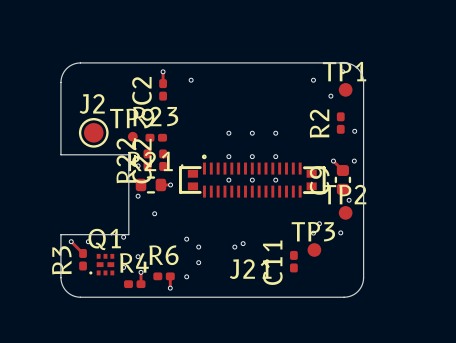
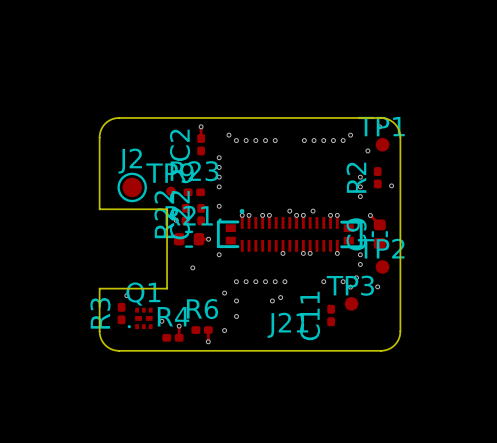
via: none -> (236, 140)
via: none -> (246, 140)
via: none -> (255, 140)
via: none -> (265, 140)
via: none -> (275, 140)
via: none -> (304, 140)
via: none -> (314, 140)
via: none -> (323, 140)
via: none -> (333, 140)
via: none -> (343, 140)
via: none -> (219, 157)
via: none -> (219, 167)
via: none -> (219, 177)
via: none -> (360, 177)
via: none -> (219, 186)
via: none -> (360, 186)
via: (228, 133) -> none
via: (252, 133) -> none
via: (275, 133) -> none
via: none -> (360, 196)
via: none -> (219, 206)
via: (228, 156) -> none
via: none -> (242, 215)
via: none -> (249, 215)
via: none -> (262, 215)
via: none -> (269, 215)
via: none -> (296, 215)
via: none -> (303, 215)
via: none -> (330, 215)
via: none -> (337, 215)
via: (354, 161) -> none
via: (228, 180) -> none
via: (252, 180) -> none
via: (275, 180) -> none
via: (138, 196) -> none
via: none -> (282, 253)
via: none -> (303, 253)
via: none -> (310, 253)
via: none -> (337, 253)
via: none -> (219, 254)
via: none -> (360, 254)
via: (349, 200) -> none
via: none -> (360, 264)
via: none -> (236, 281)
via: none -> (246, 281)
via: none -> (255, 281)
via: none -> (265, 281)
via: none -> (275, 281)
via: none -> (284, 281)
via: none -> (323, 281)
via: none -> (343, 281)
via: (123, 237) -> none
track: (71, 241) (83, 253) -> none
via: (71, 241) -> none
via: (138, 256) -> none

